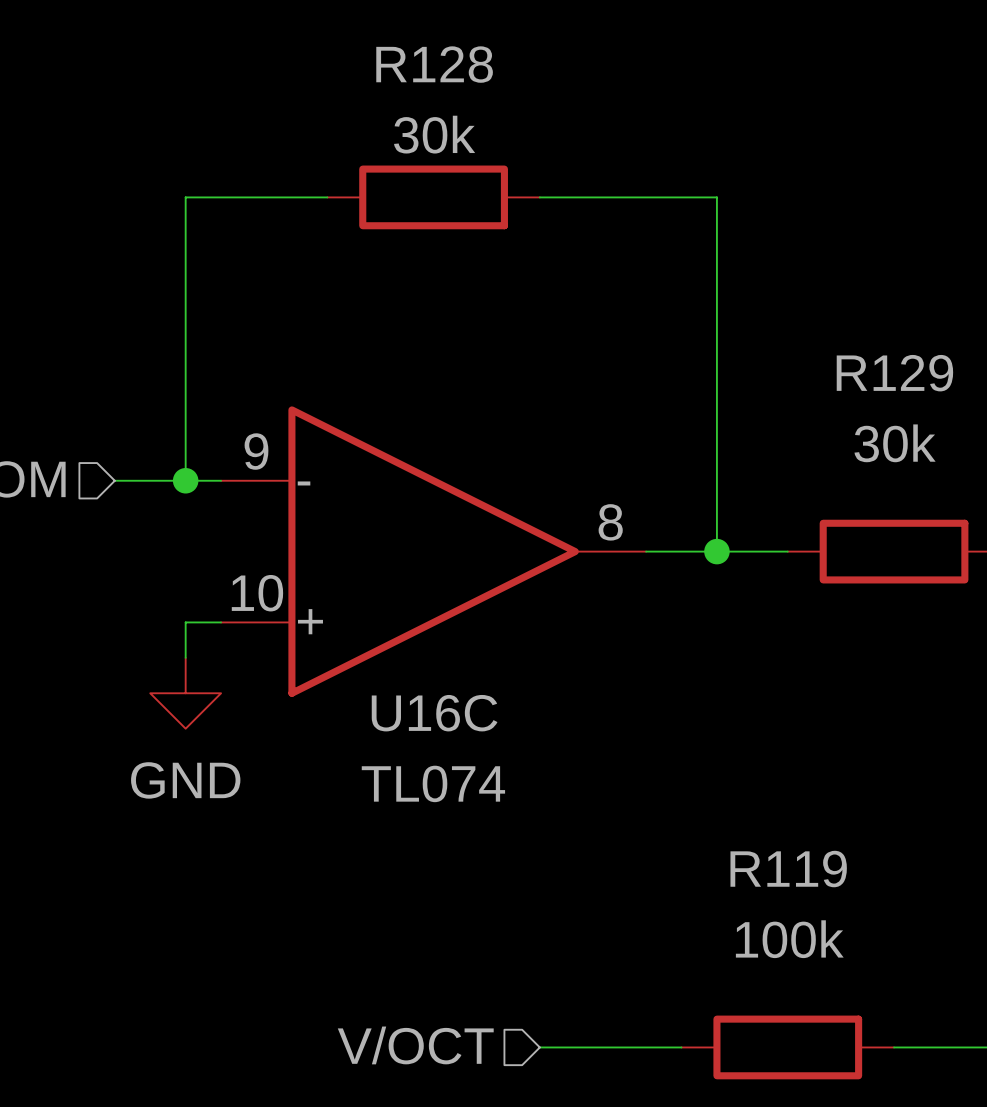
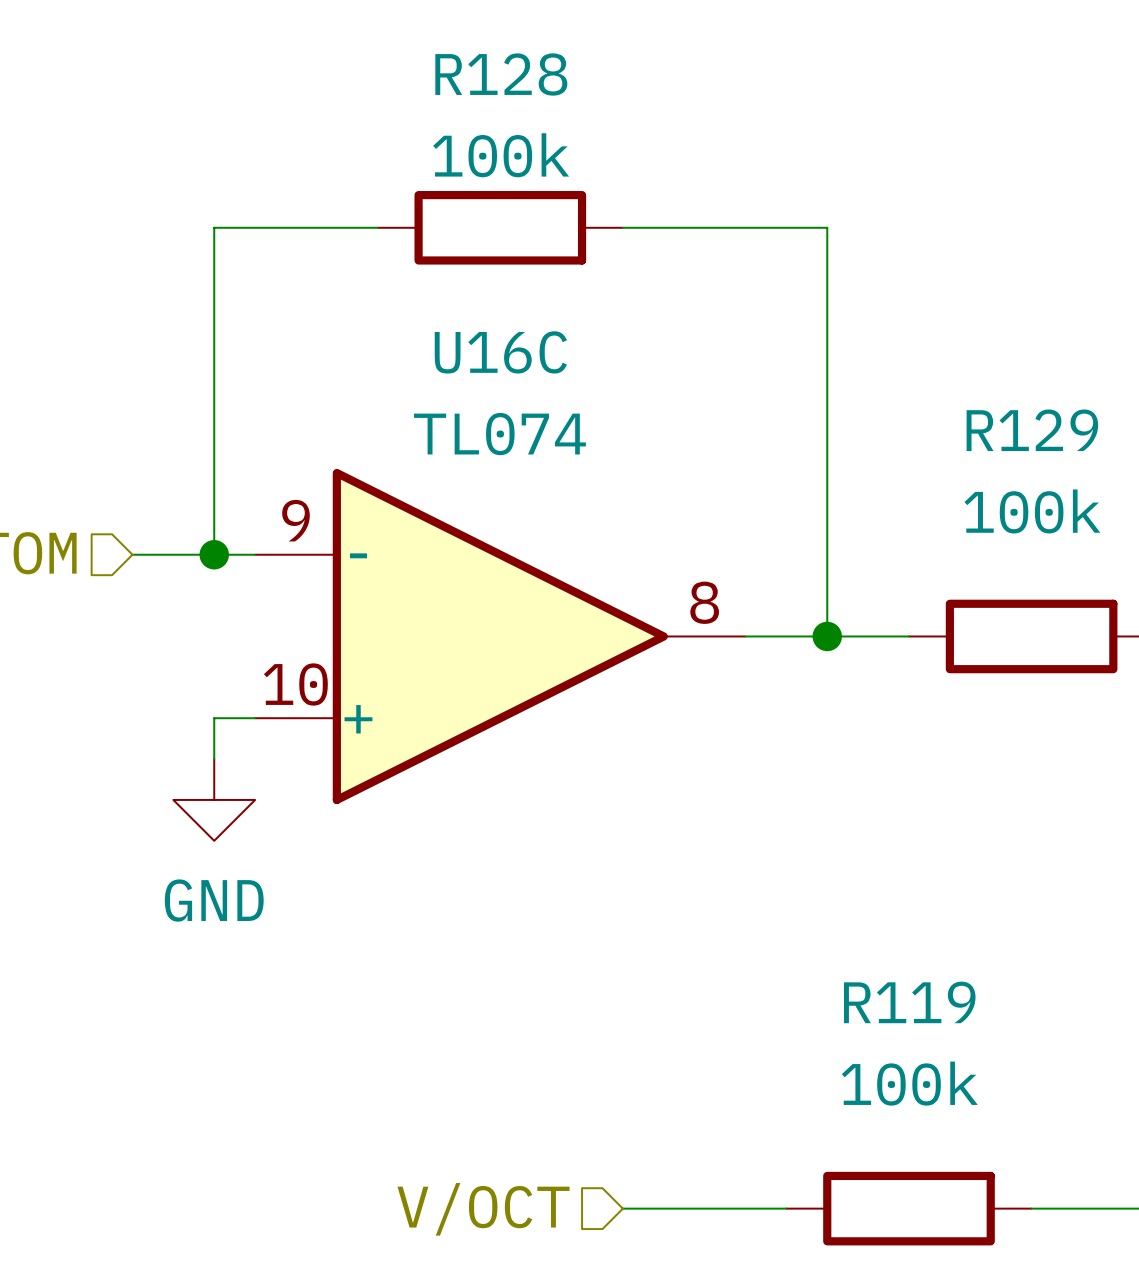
R128 value: 30k (434, 134) -> 100k (501, 155)
R129 value: 30k (895, 443) -> 100k (1032, 511)
U16C name position: U16C (434, 713) -> U16C (500, 352)
U16C value position: TL074 (433, 783) -> TL074 (499, 434)

